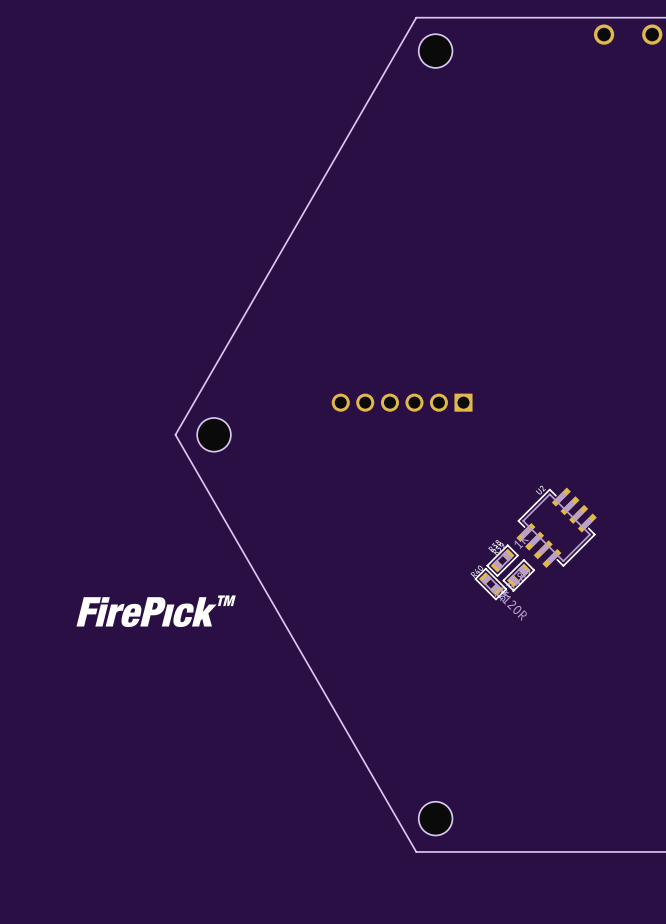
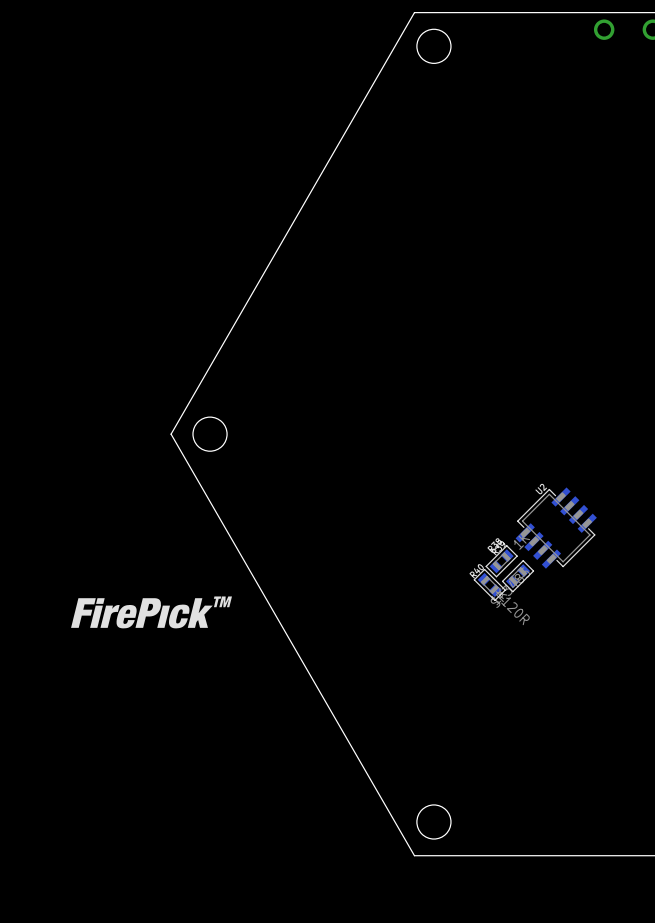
part: (402, 402) -> none

